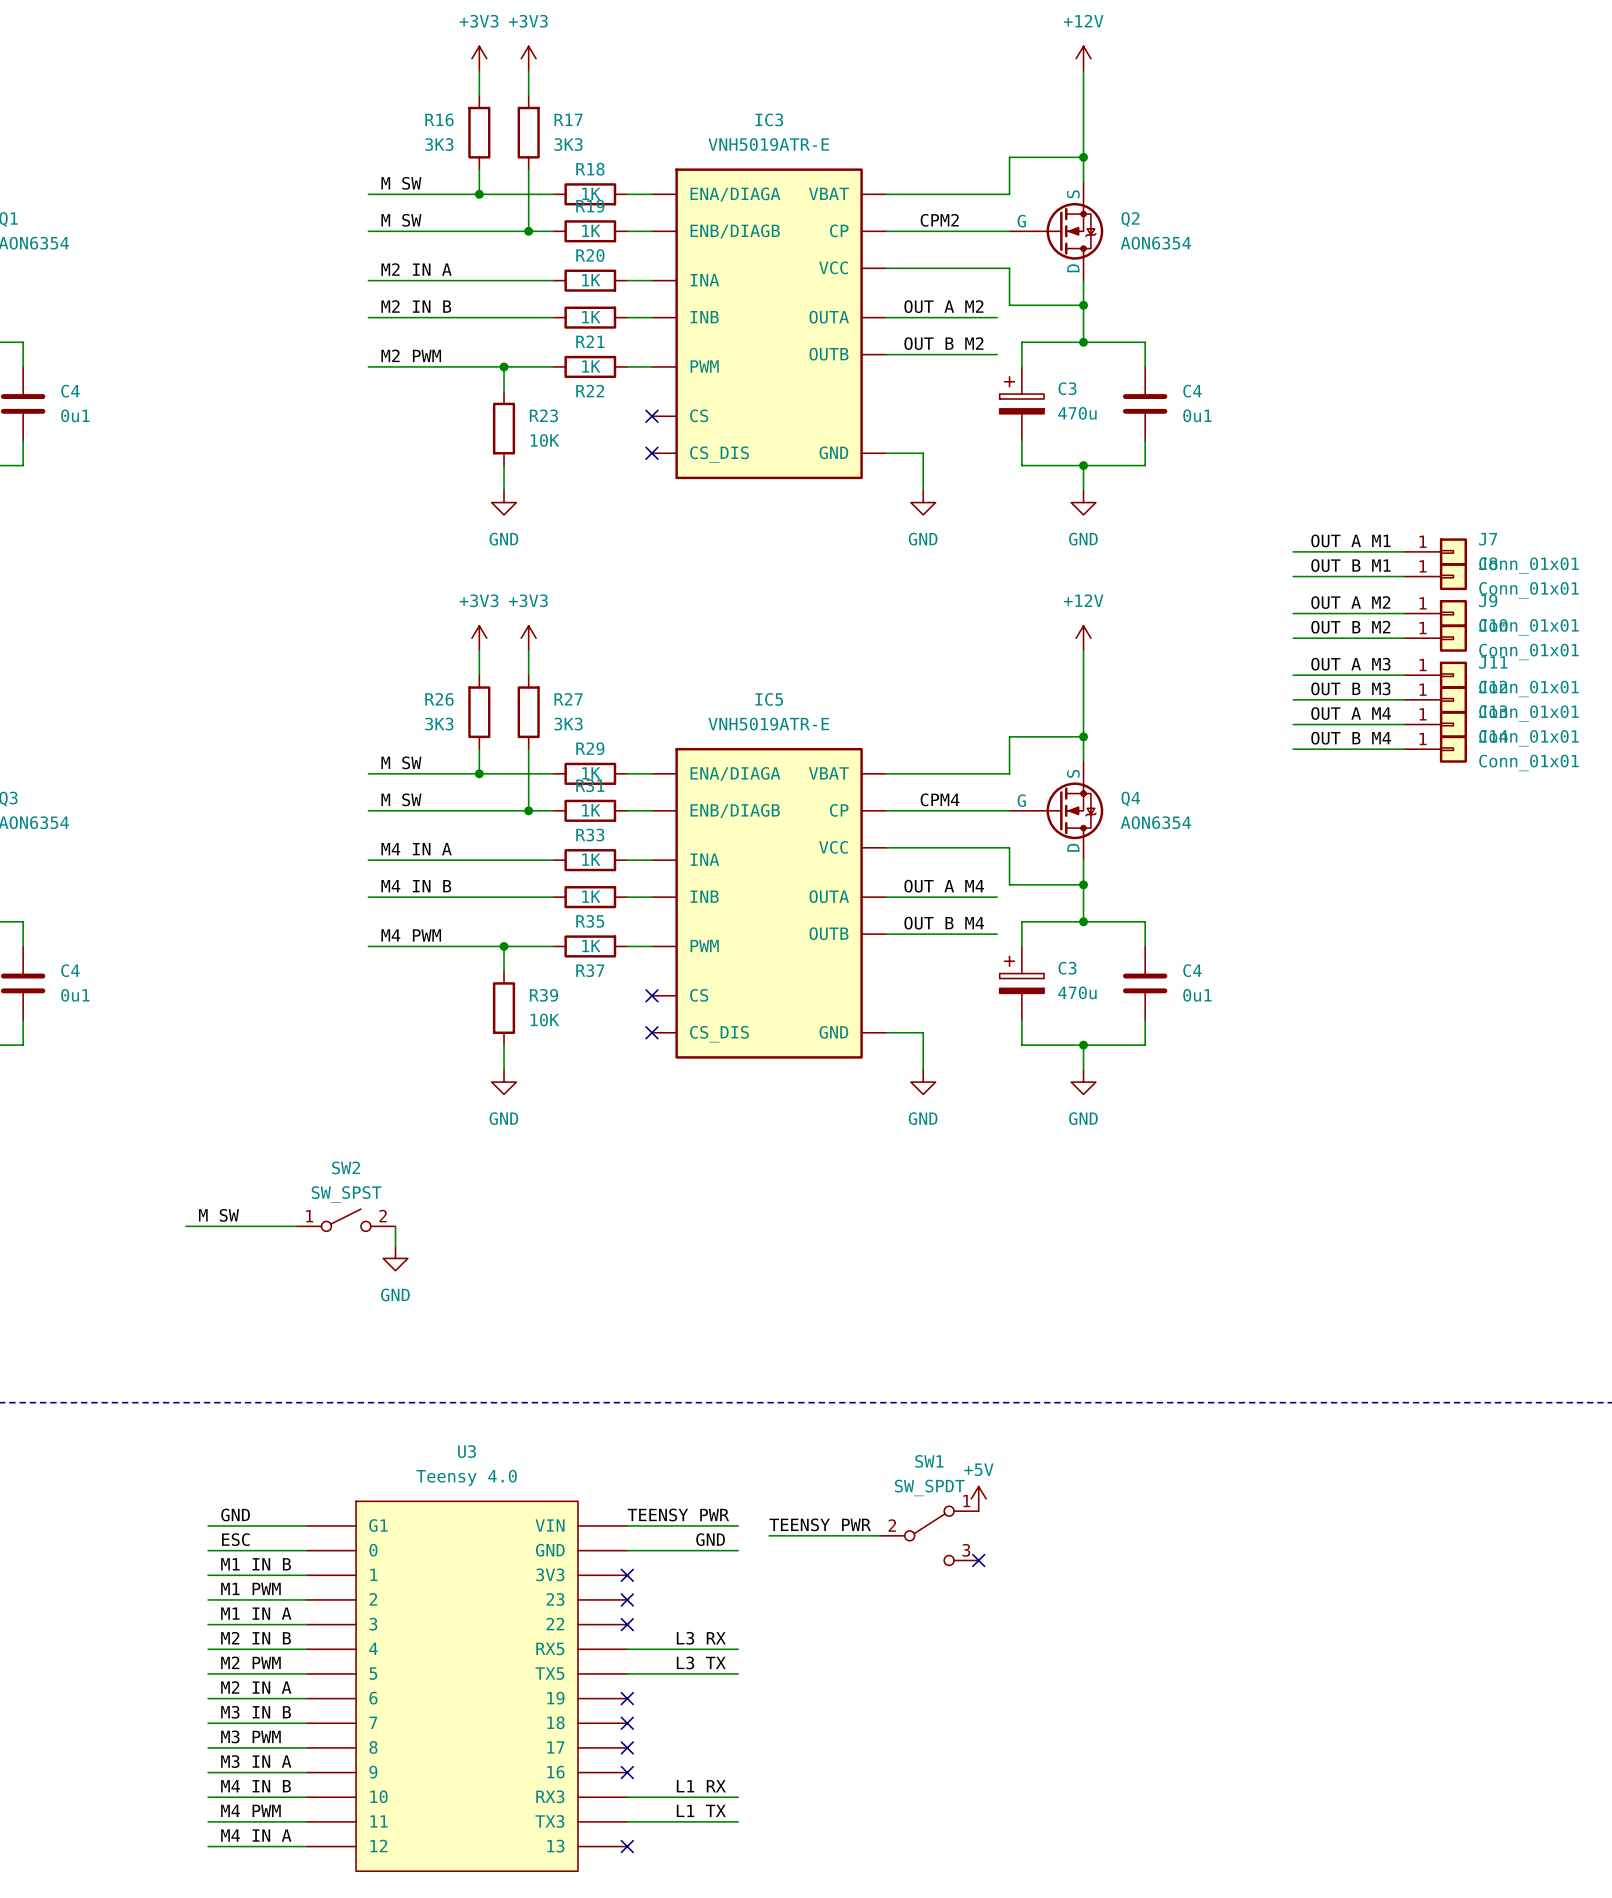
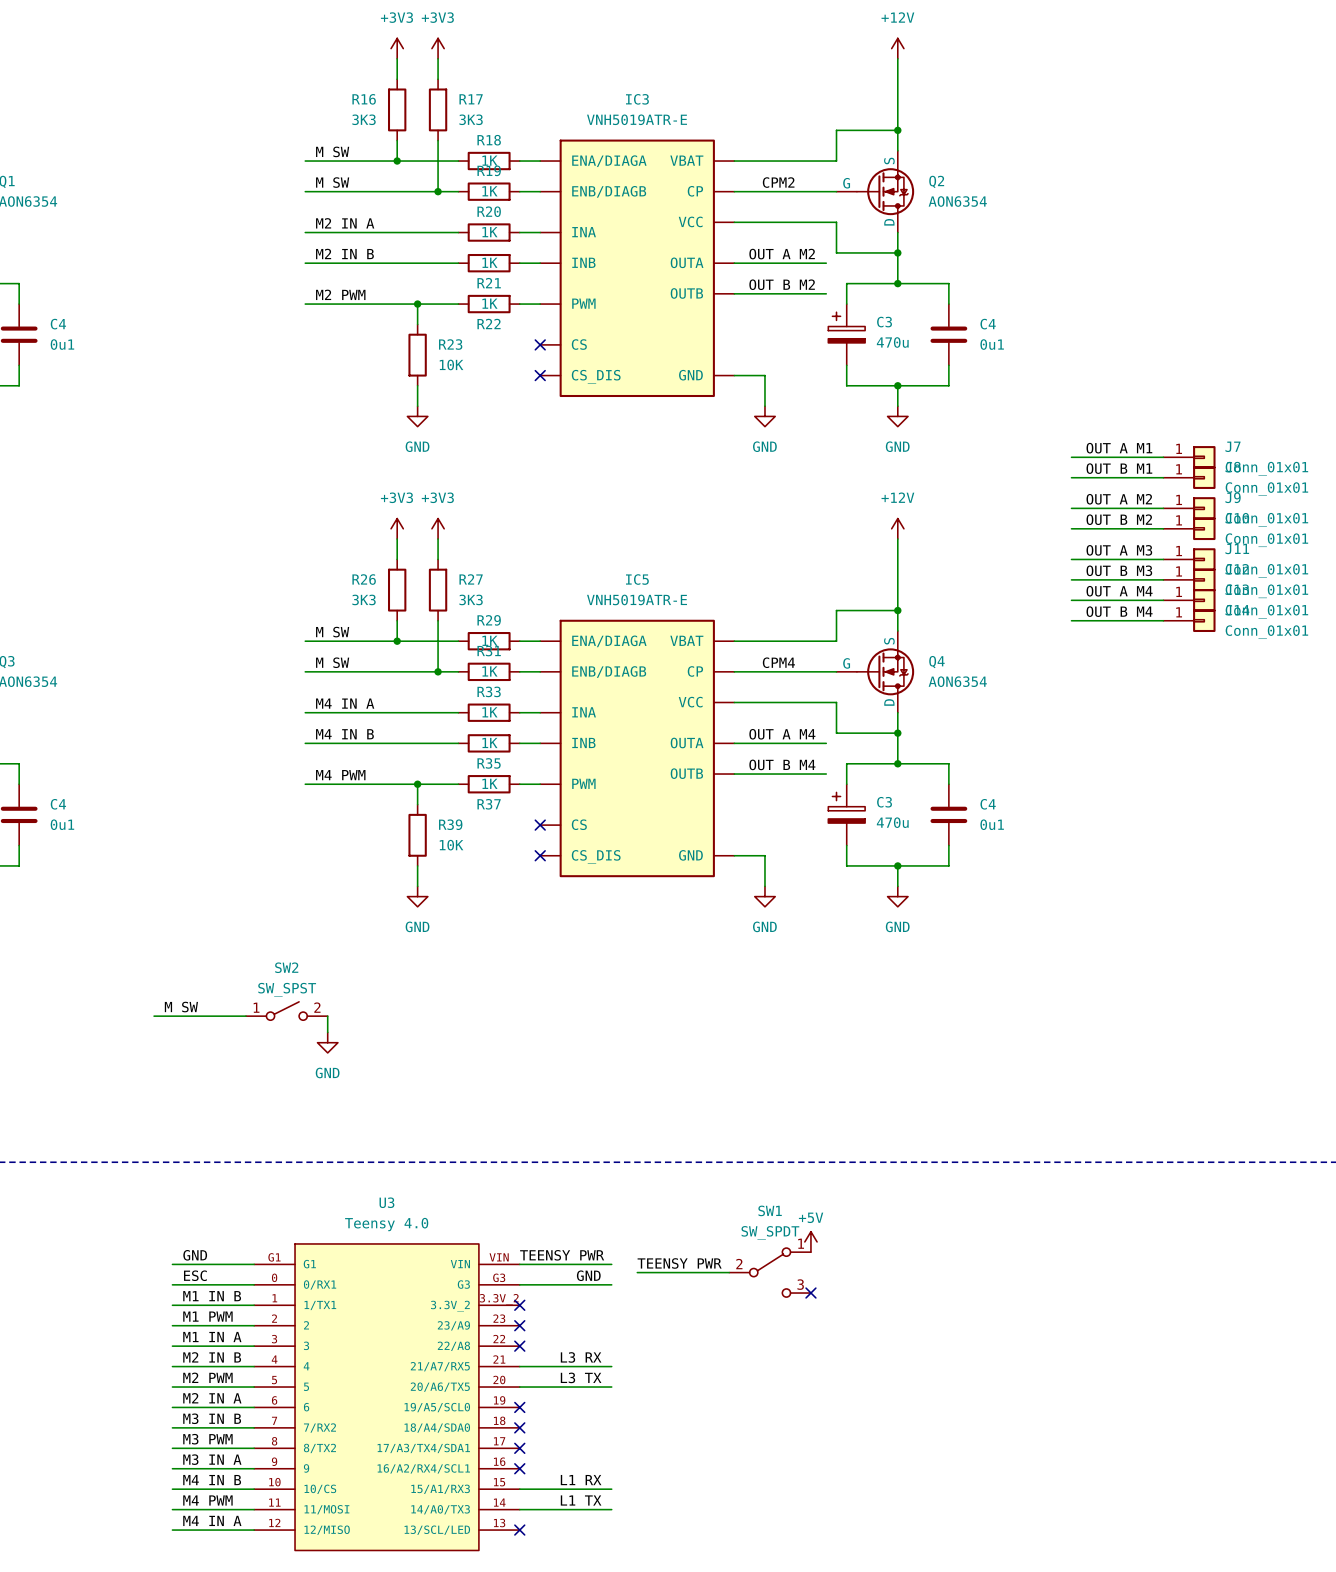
U3 symbol: [306, 1500, 628, 1872] -> [254, 1243, 520, 1552]

